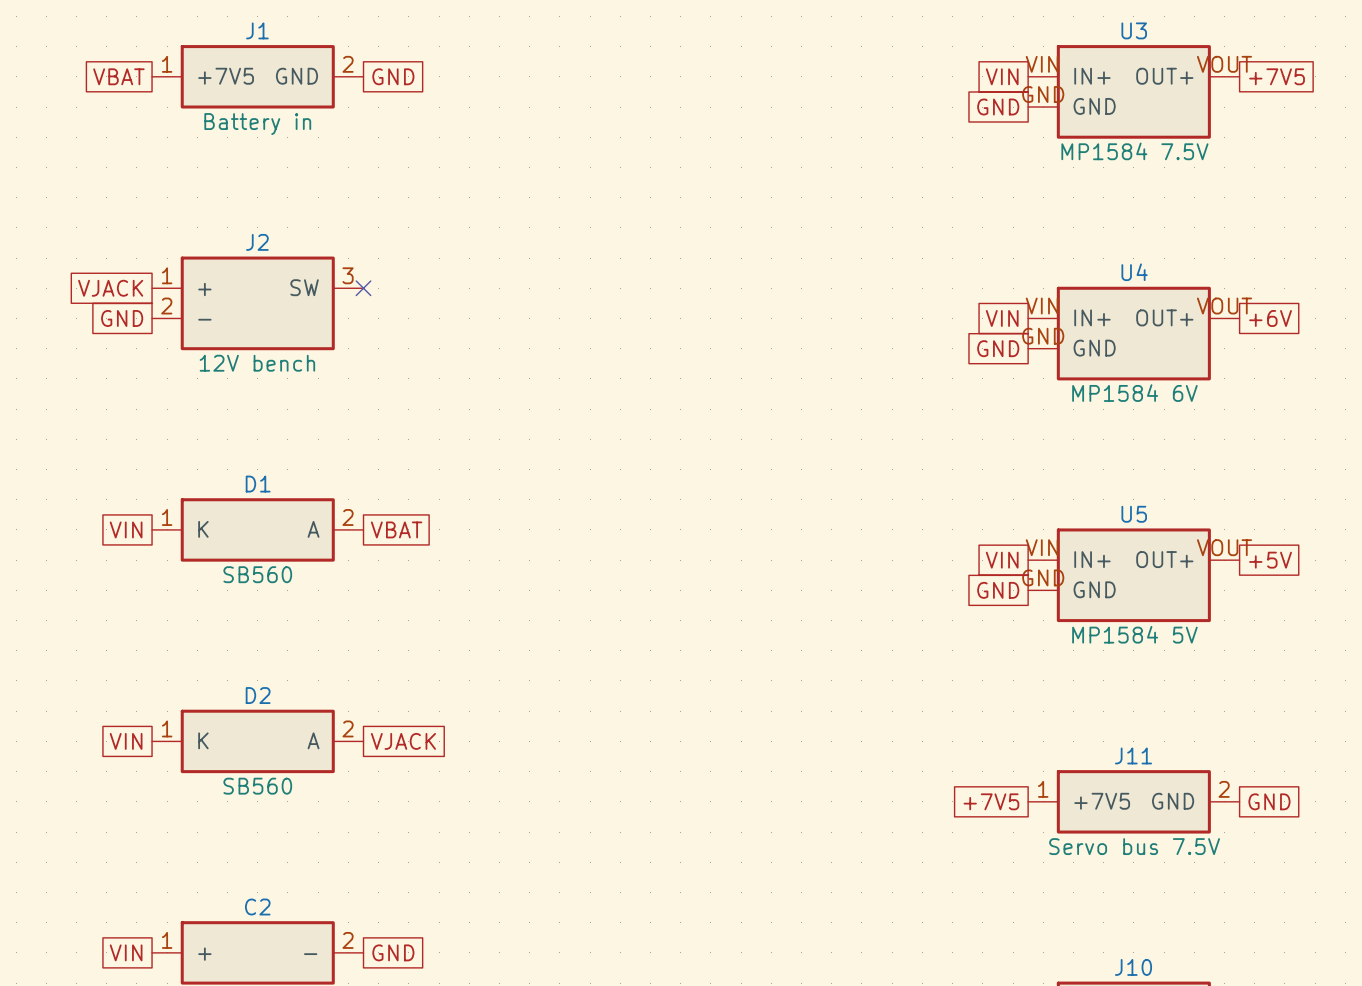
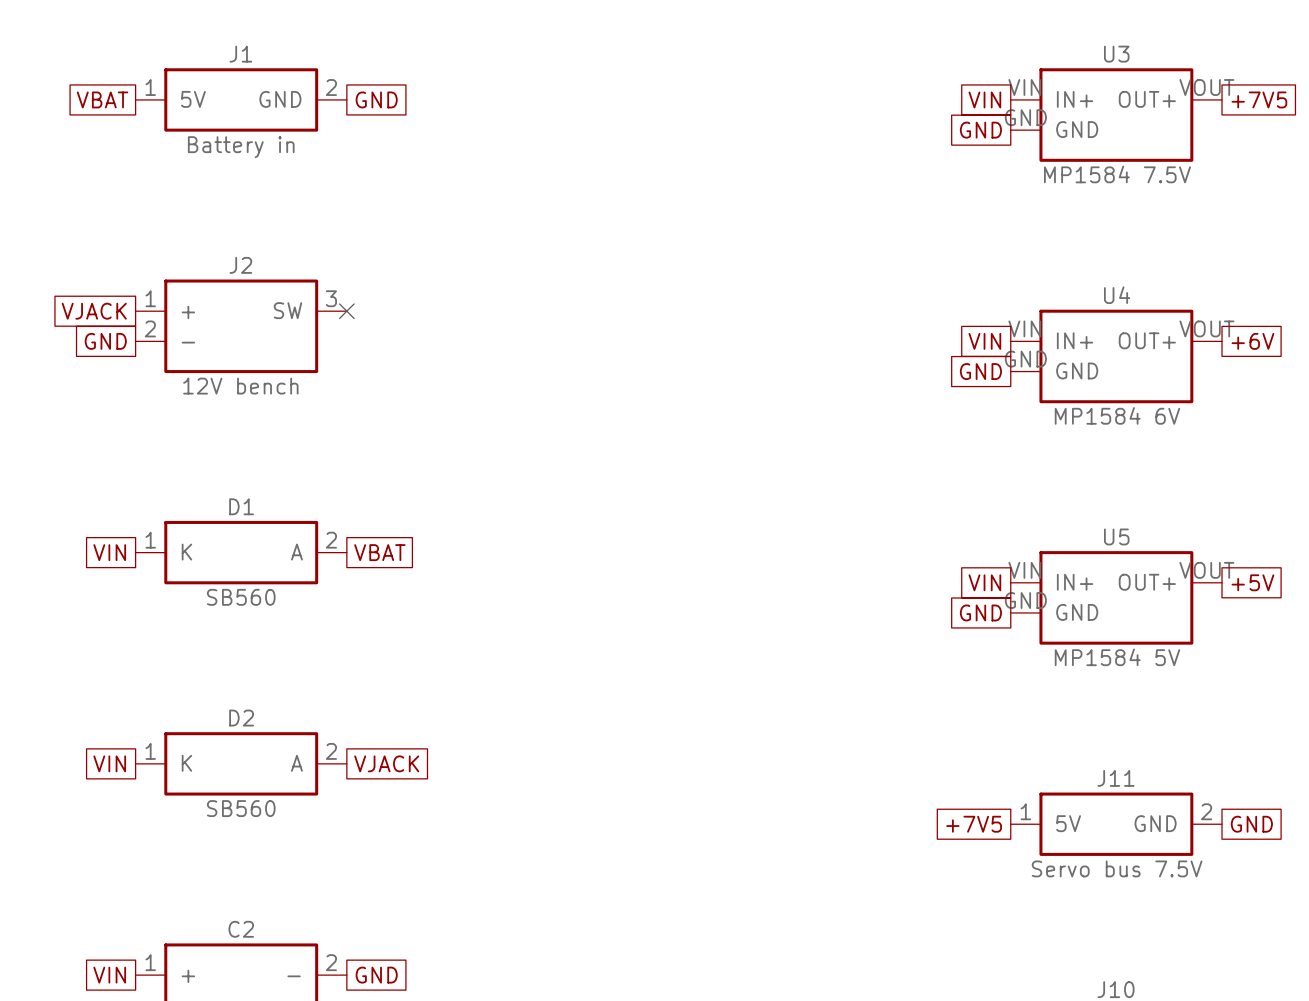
J1 pin name: +7V5 (226, 76) -> 5V (193, 99)
J11 pin name: +7V5 (1102, 801) -> 5V (1068, 823)

